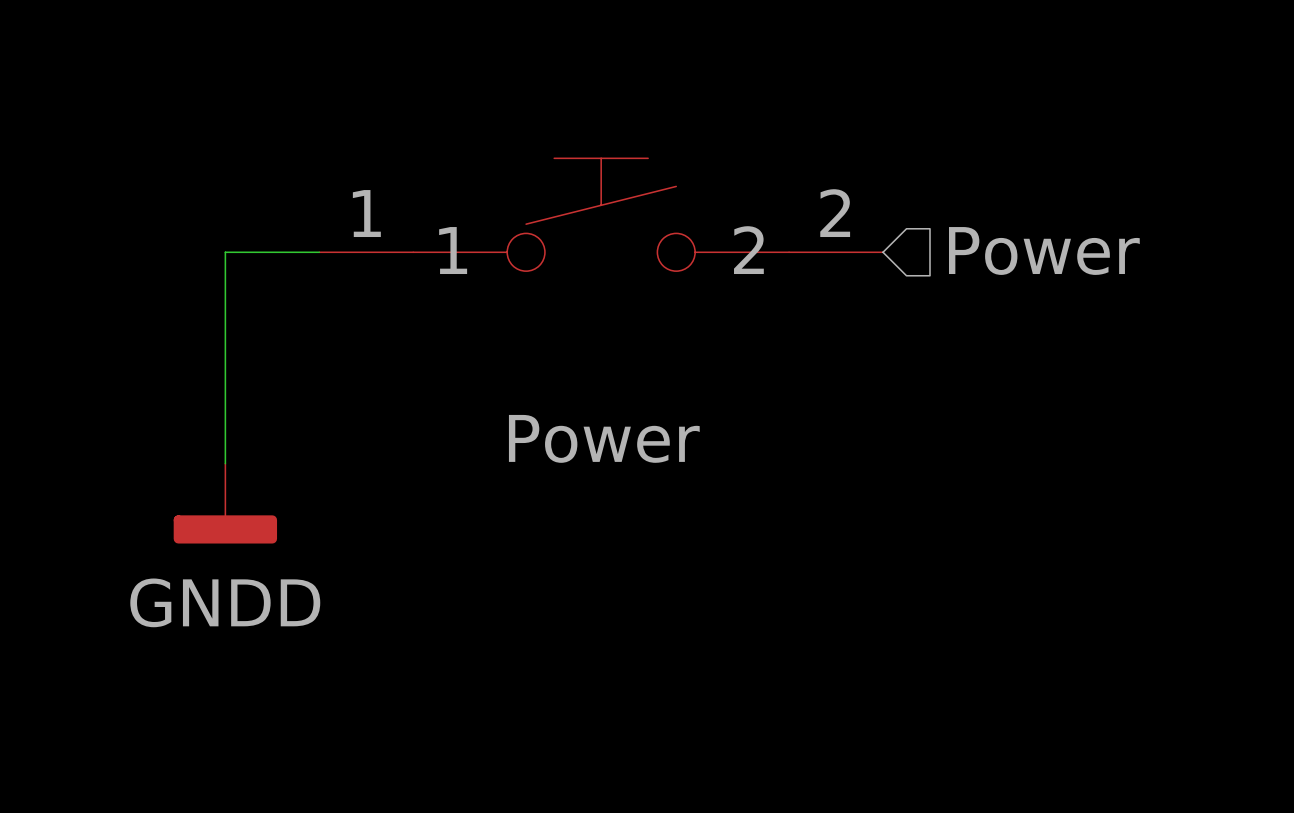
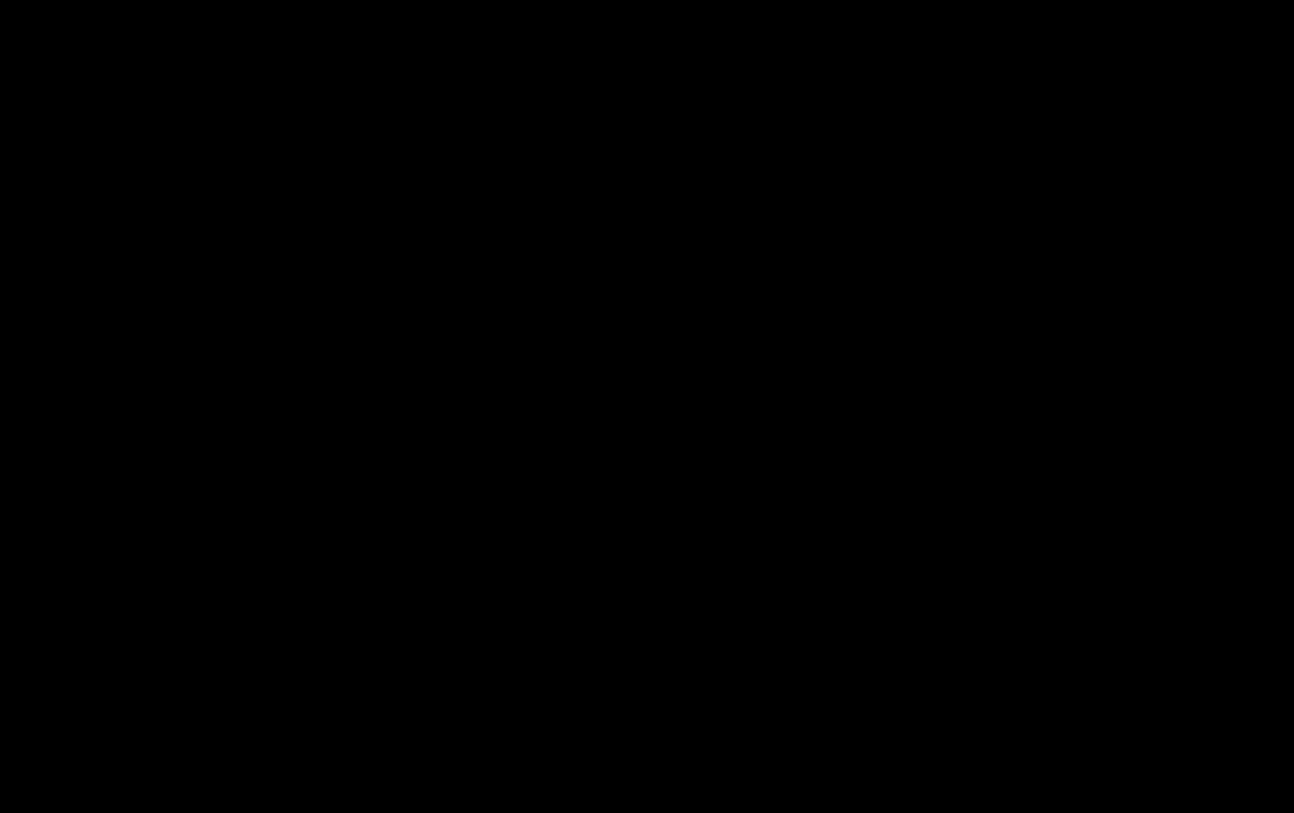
part: Power (601, 214) -> none
hierarchical label: Power (1044, 250) -> none
wire: (319, 252) (225, 252) (225, 463) -> none
power symbol: GNDD (225, 503) -> none

